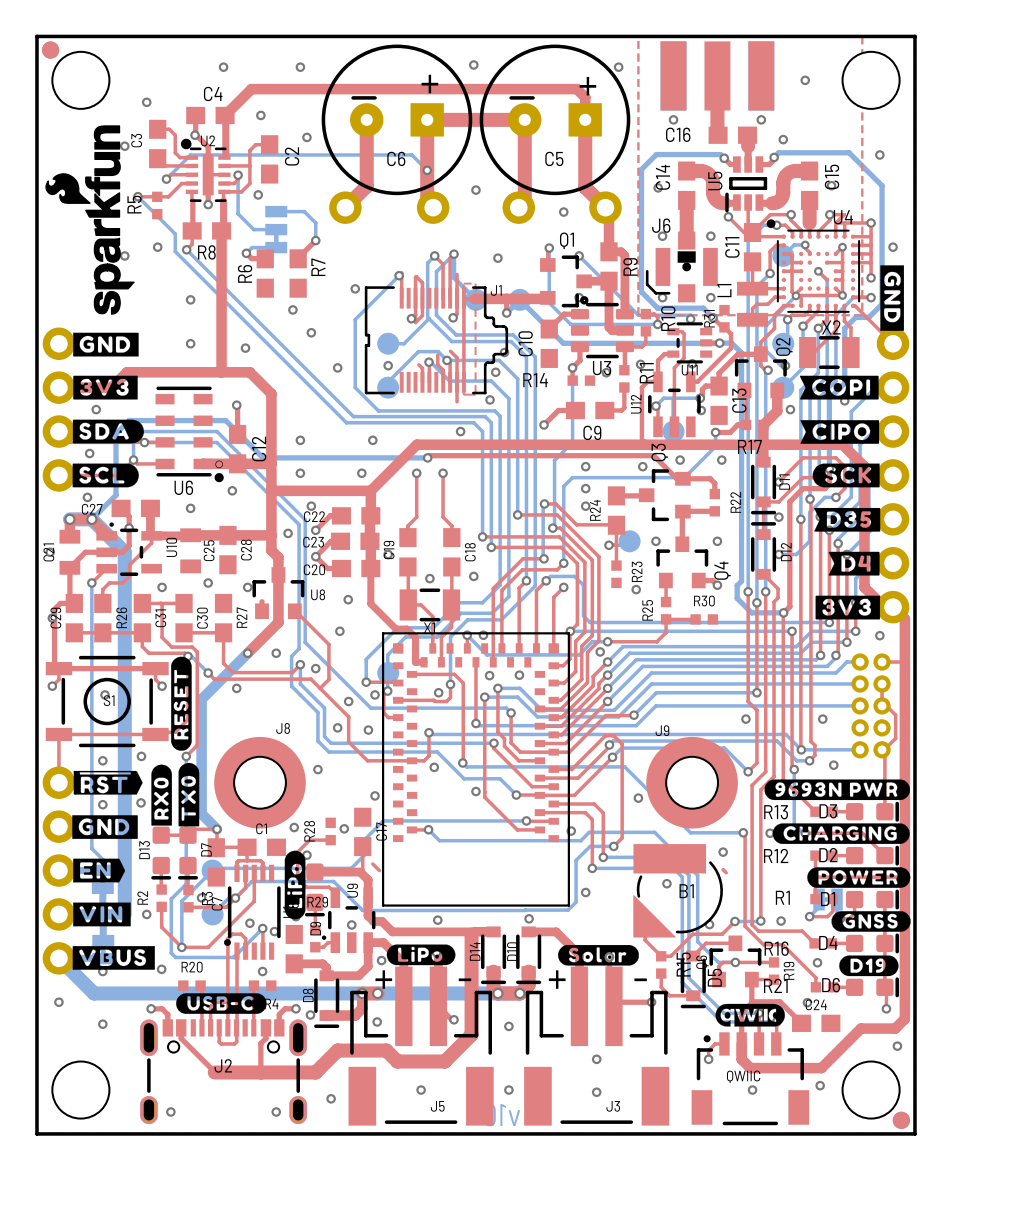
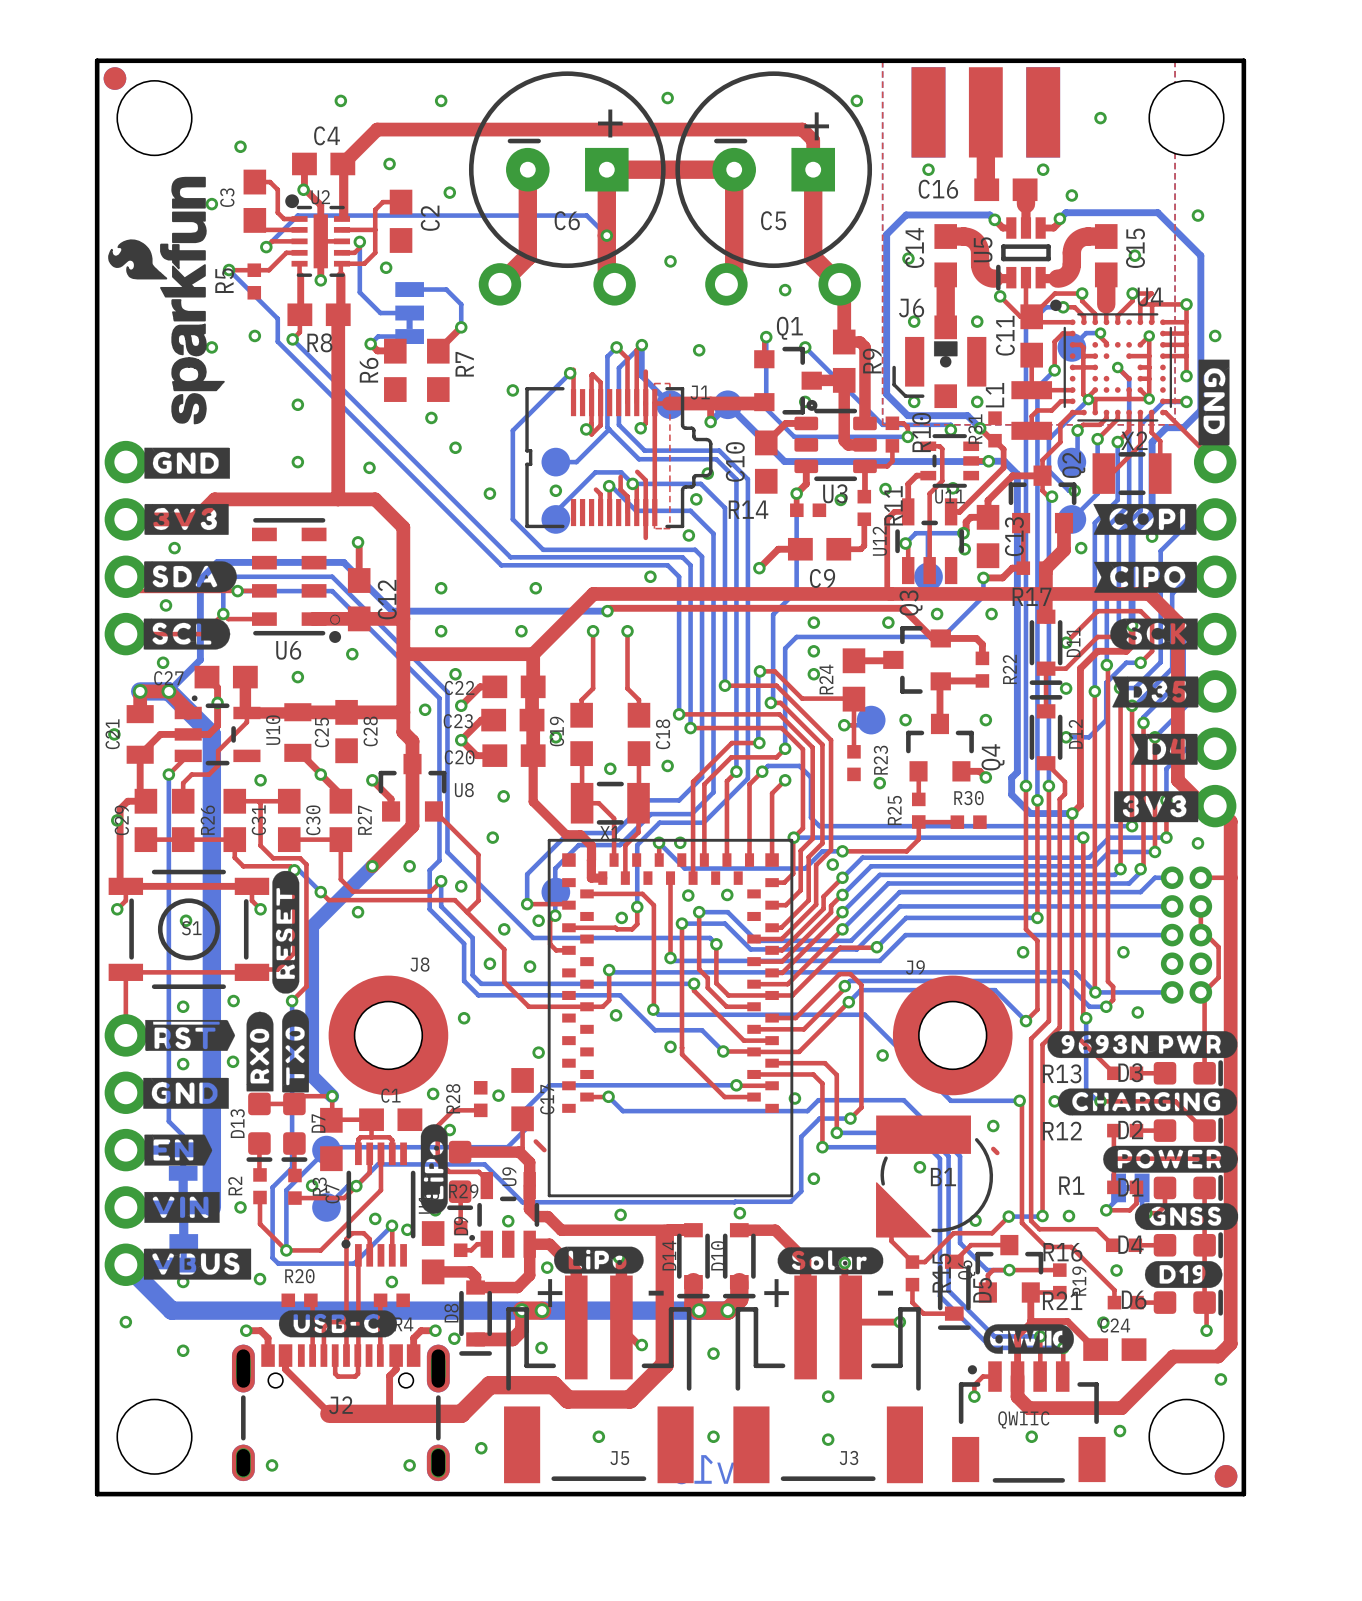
top track: none -> (297, 750) (340, 794)
top track: none -> (372, 780) (391, 798)

